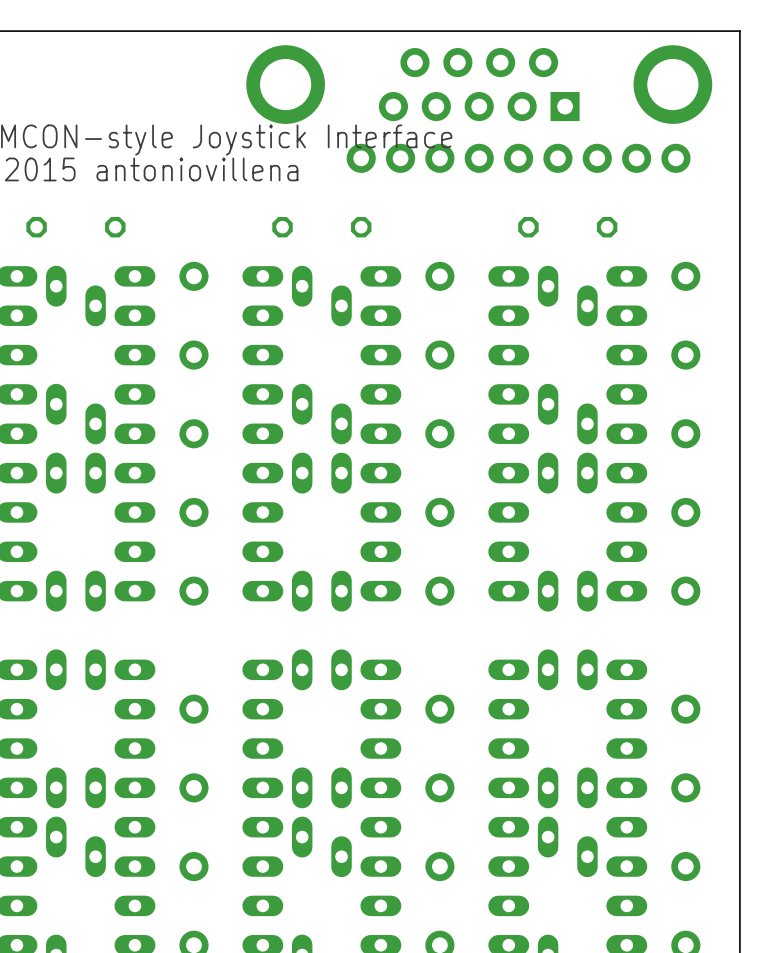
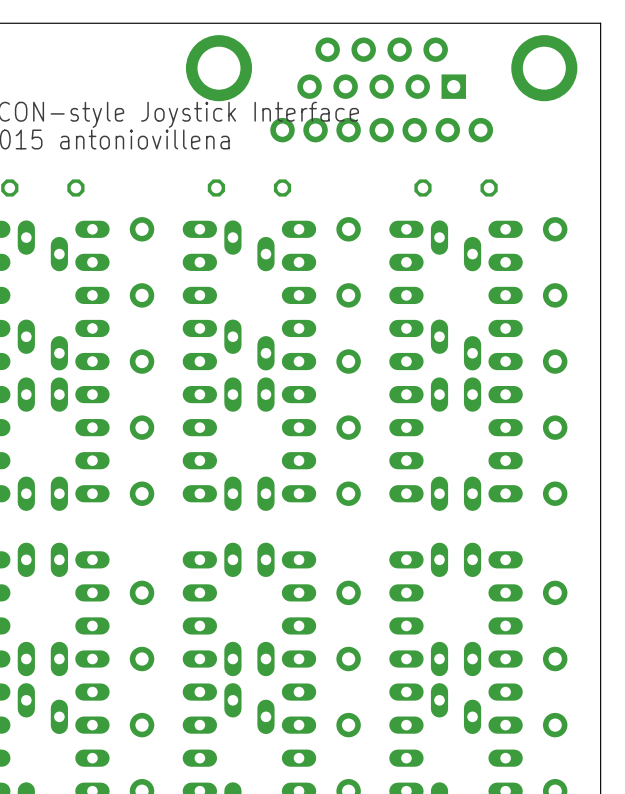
part: (636, 158) -> none
part: (675, 158) -> none

